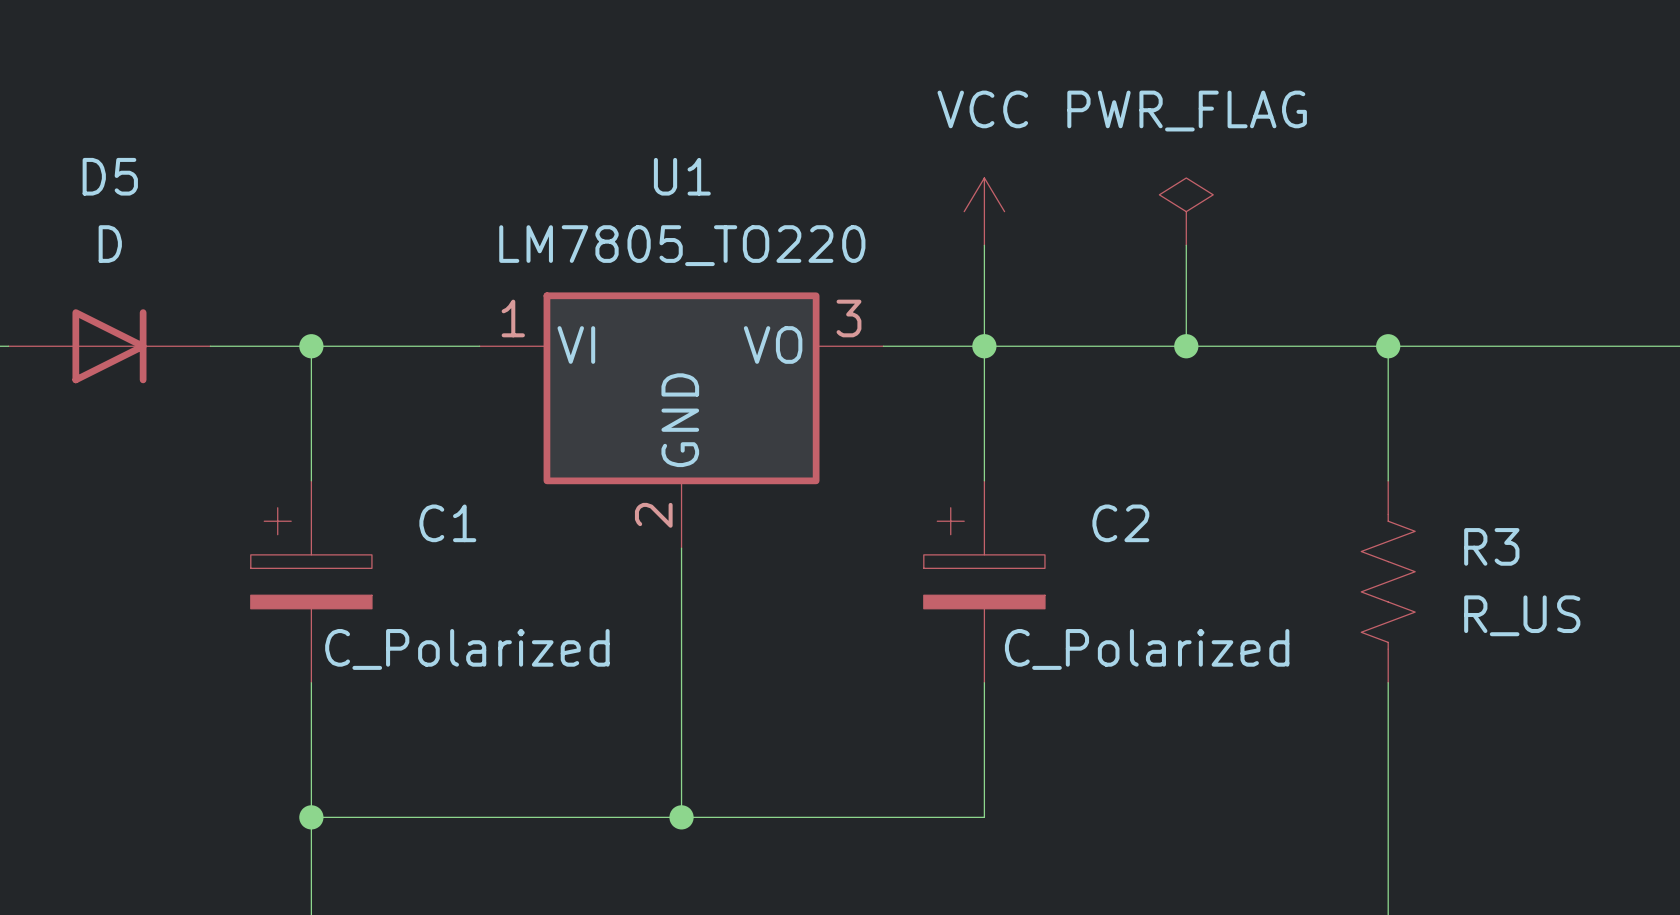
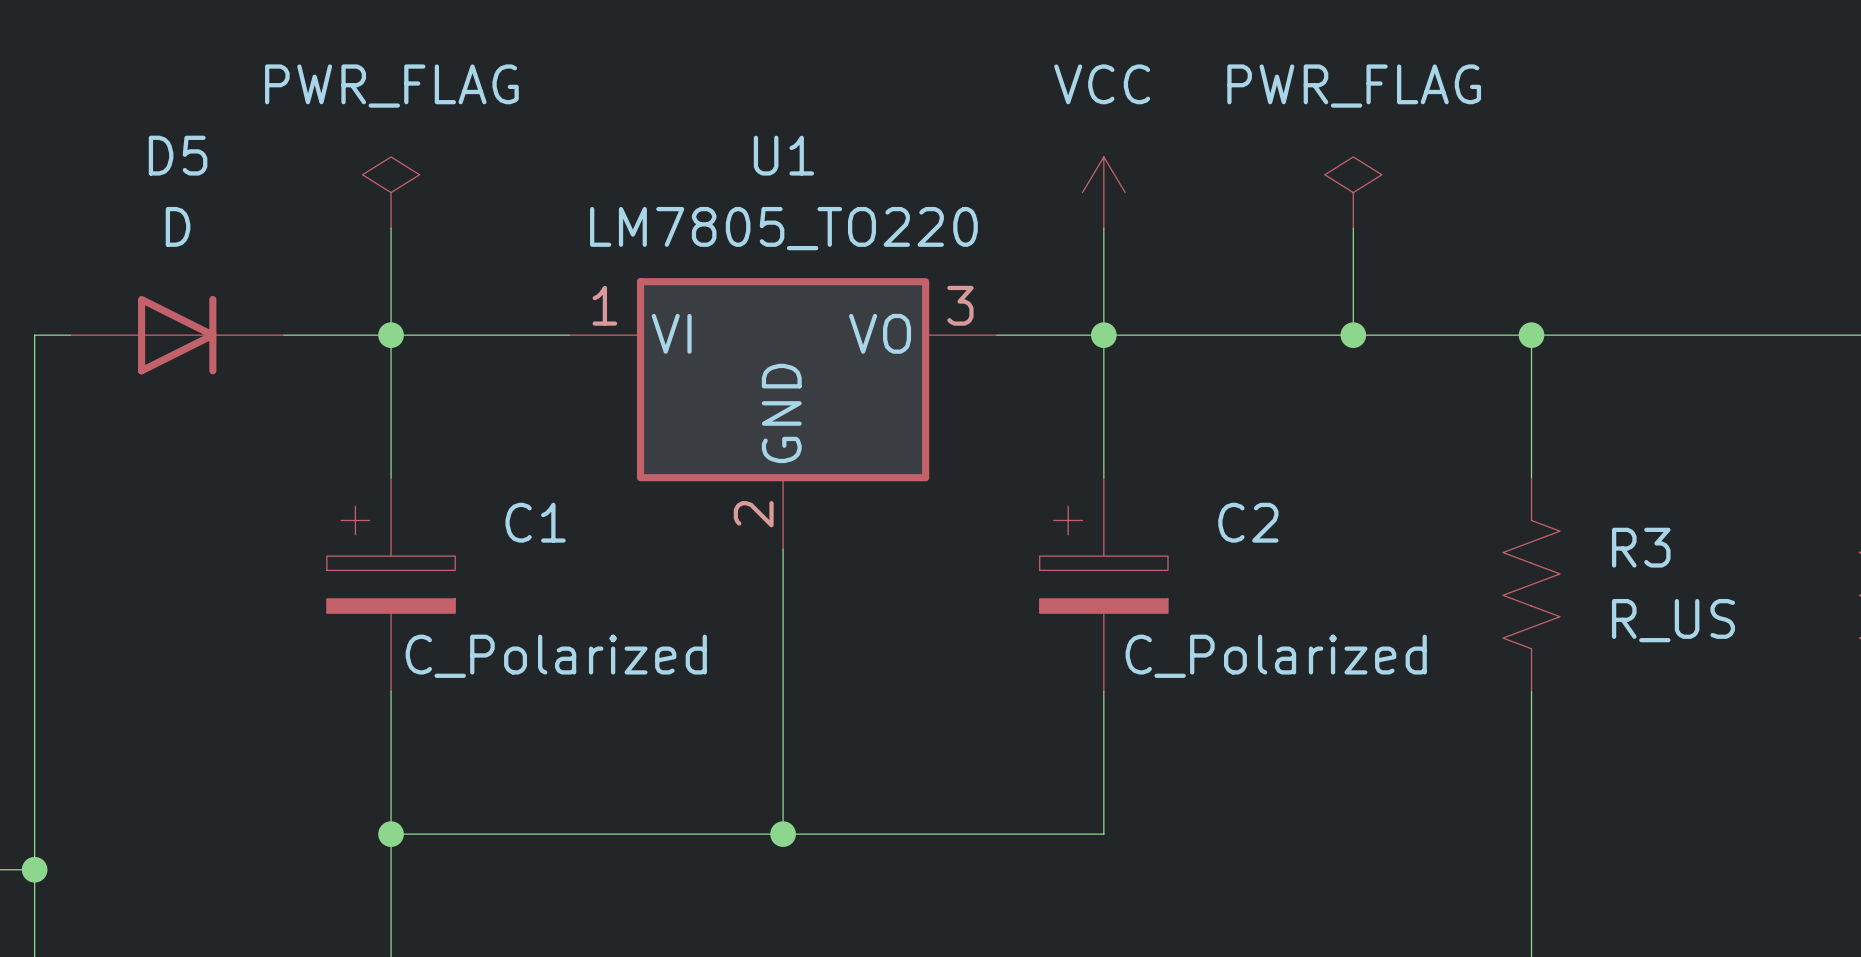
power symbol: none -> PWR_FLAG (391, 192)
power symbol position: PWR_FLAG (1186, 211) -> PWR_FLAG (1353, 192)
wire: none -> (391, 228) (391, 335)
wire: (1186, 245) (1186, 346) -> (1353, 228) (1353, 335)
junction position: (1186, 346) -> (1353, 335)

